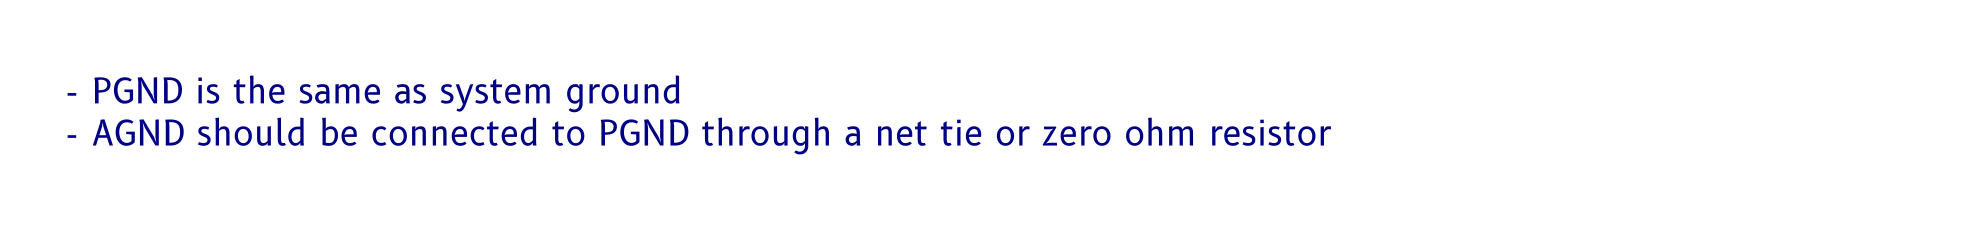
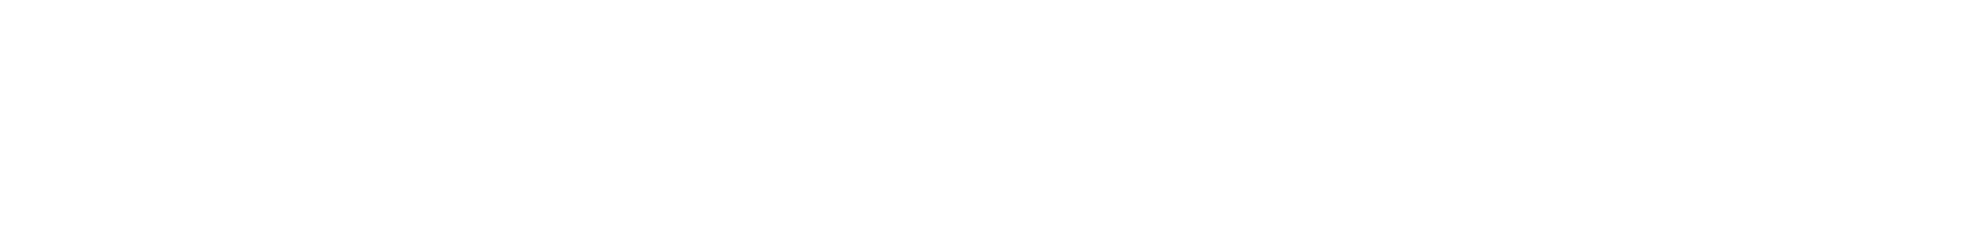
text: - PGND is the same as system ground (373, 93) -> none
text: - AGND should be connected to PGND through a net tie or zero ohm resistor (699, 136) -> none

